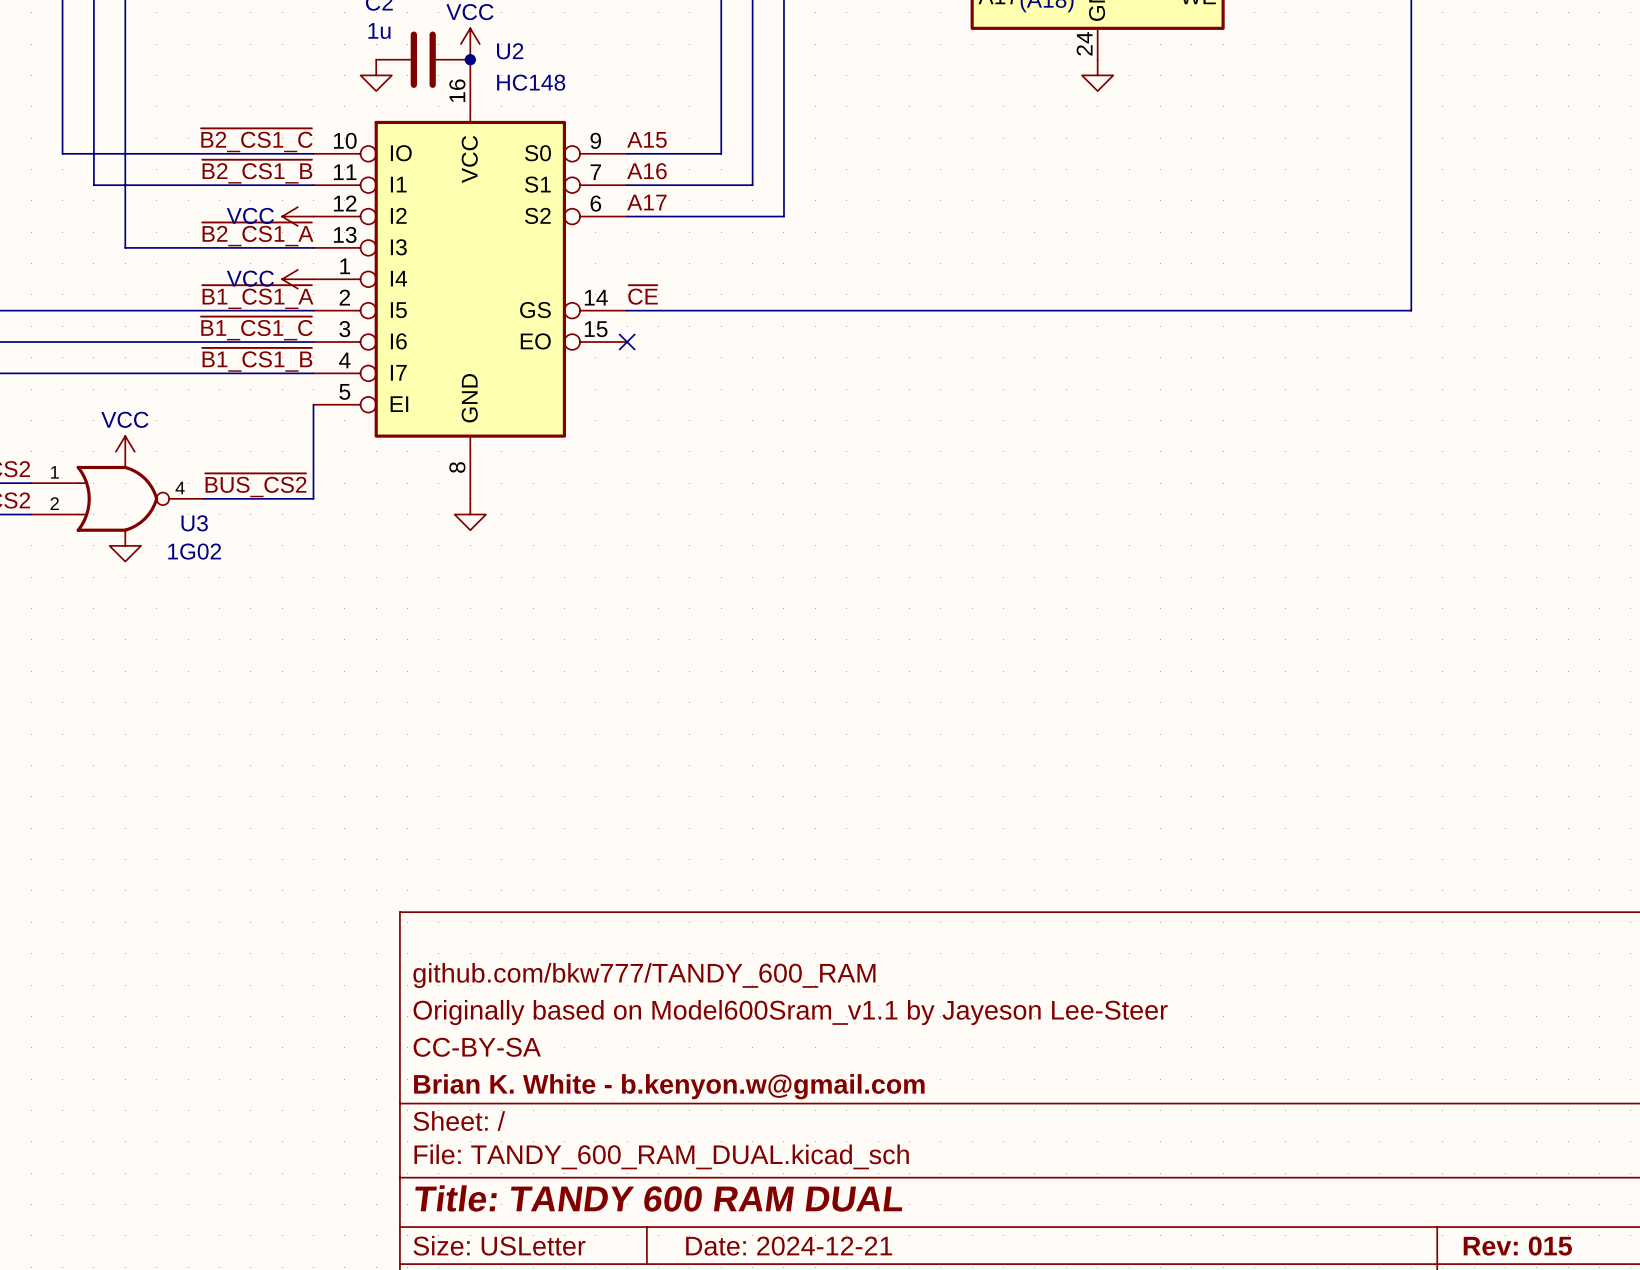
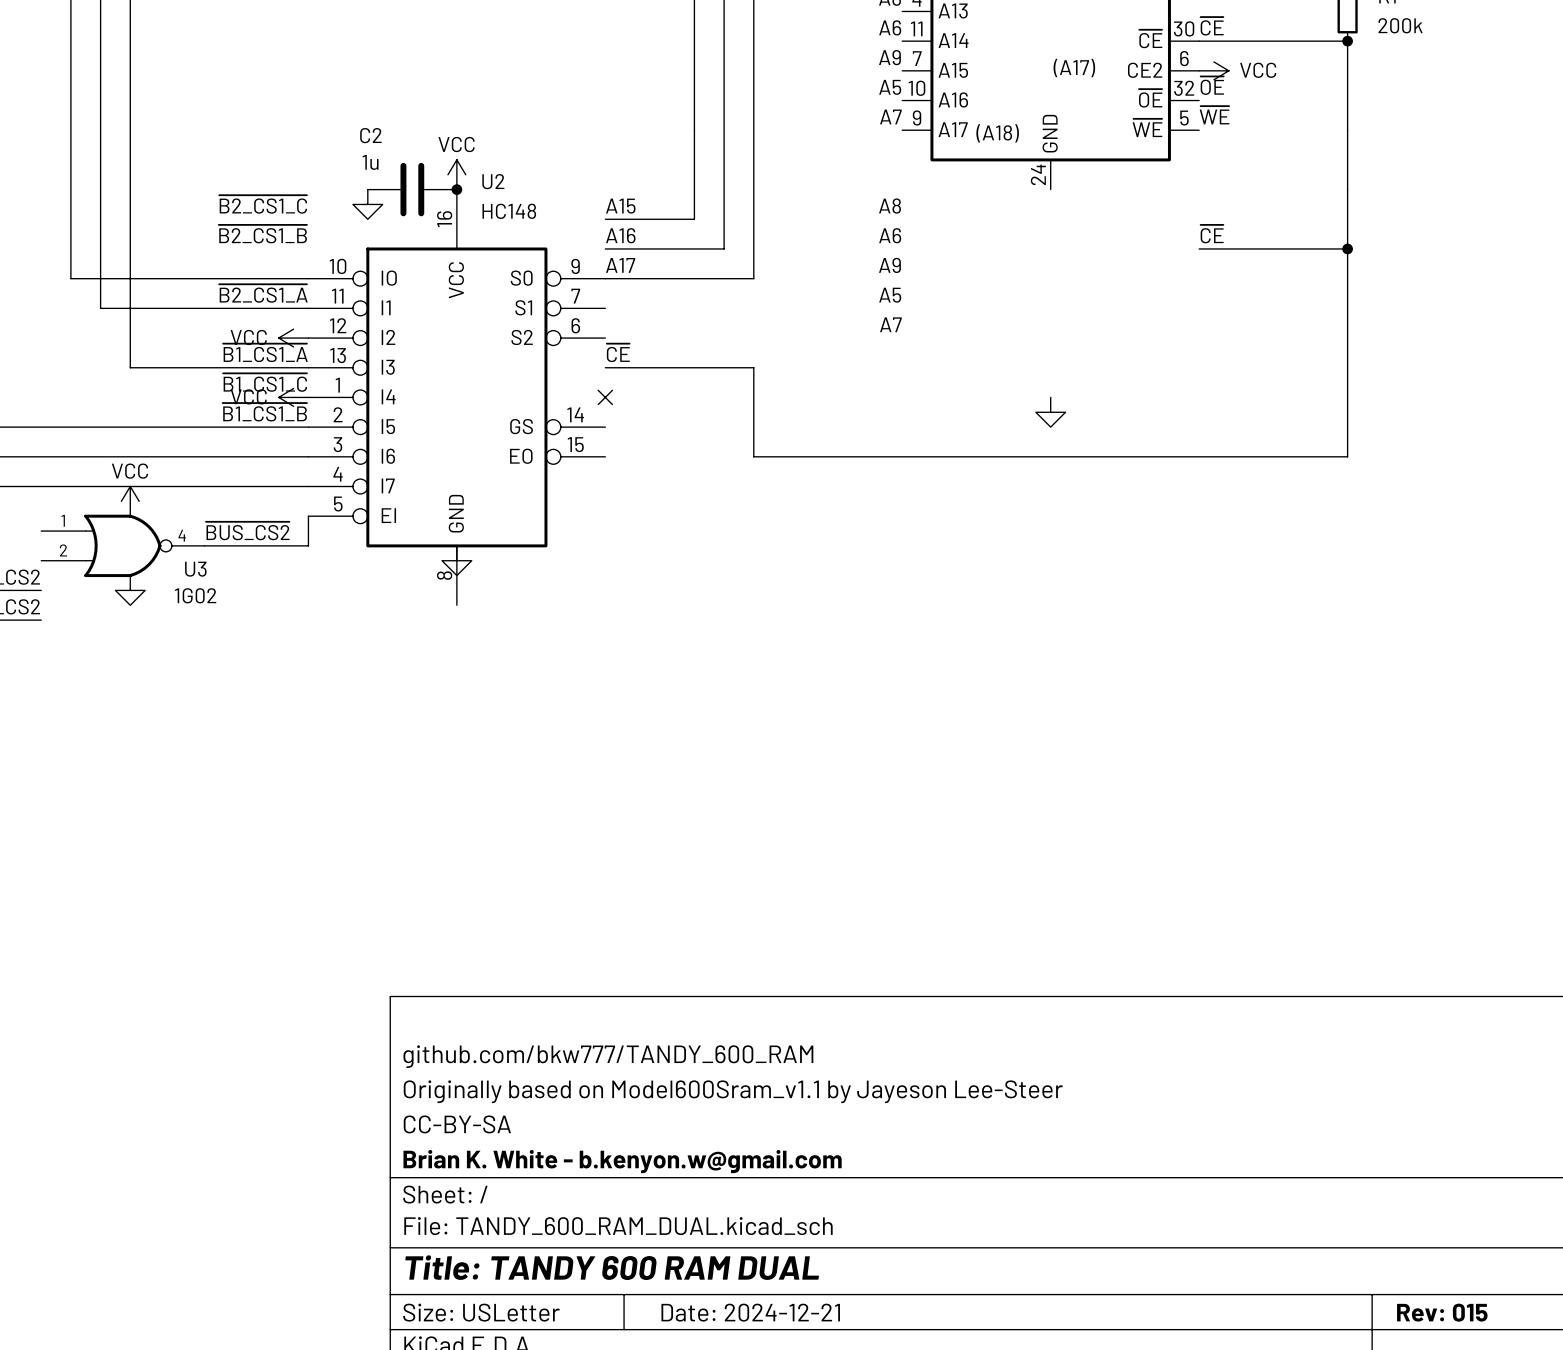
power symbol position: (1097, 75) -> (1050, 412)
label: none -> A15 (620, 206)
label: none -> A8 (889, 206)
wire: none -> (605, 219) (694, 219)
wire: (721, 91) (721, 153) -> (753, 278) (694, 278)
label: none -> ~{CE} (1212, 234)
label: none -> ~{B2_CS1_B} (262, 234)
label: none -> A6 (890, 235)
wire: (752, 122) (752, 185) (627, 185) -> (724, 248) (605, 248)
wire: none -> (1199, 248) (1347, 248)
junction: none -> (1347, 248)
label: A15 (646, 139) -> A17 (620, 265)
label: none -> A9 (889, 265)
label position: ~{B2_CS1_C} (256, 140) -> ~{B2_CS1_C} (263, 204)
wire: (783, 153) (783, 216) (627, 216) -> none
label: ~{B2_CS1_B} (257, 171) -> ~{B2_CS1_A} (263, 293)
label position: A16 (646, 171) -> A16 (620, 235)
label: none -> A5 (890, 295)
label: A17 (646, 202) -> none
label: none -> A7 (890, 324)
label: ~{B2_CS1_A} (257, 234) -> ~{B1_CS1_A} (265, 352)
label position: ~{CE} (643, 294) -> ~{CE} (618, 352)
label: ~{B1_CS1_A} (257, 297) -> ~{B1_CS1_B} (264, 412)
wire: (627, 310) (1411, 310) -> (605, 367) (753, 367) (753, 456) (1347, 456) (1347, 427)
label position: ~{B1_CS1_C} (256, 328) -> ~{B1_CS1_C} (265, 382)
no-connect mark position: (627, 342) -> (605, 397)
label: ~{B1_CS1_B} (257, 359) -> none
wire: (313, 436) (313, 498) (203, 498) -> (308, 545) (204, 545)
power symbol position: VCC (125, 451) -> VCC (130, 501)
label position: ~{BUS_CS2} (255, 485) -> ~{BUS_CS2} (247, 531)
U3 position: (117, 498) -> (122, 545)
power symbol position: (470, 514) -> (456, 560)
power symbol position: (125, 545) -> (130, 590)

